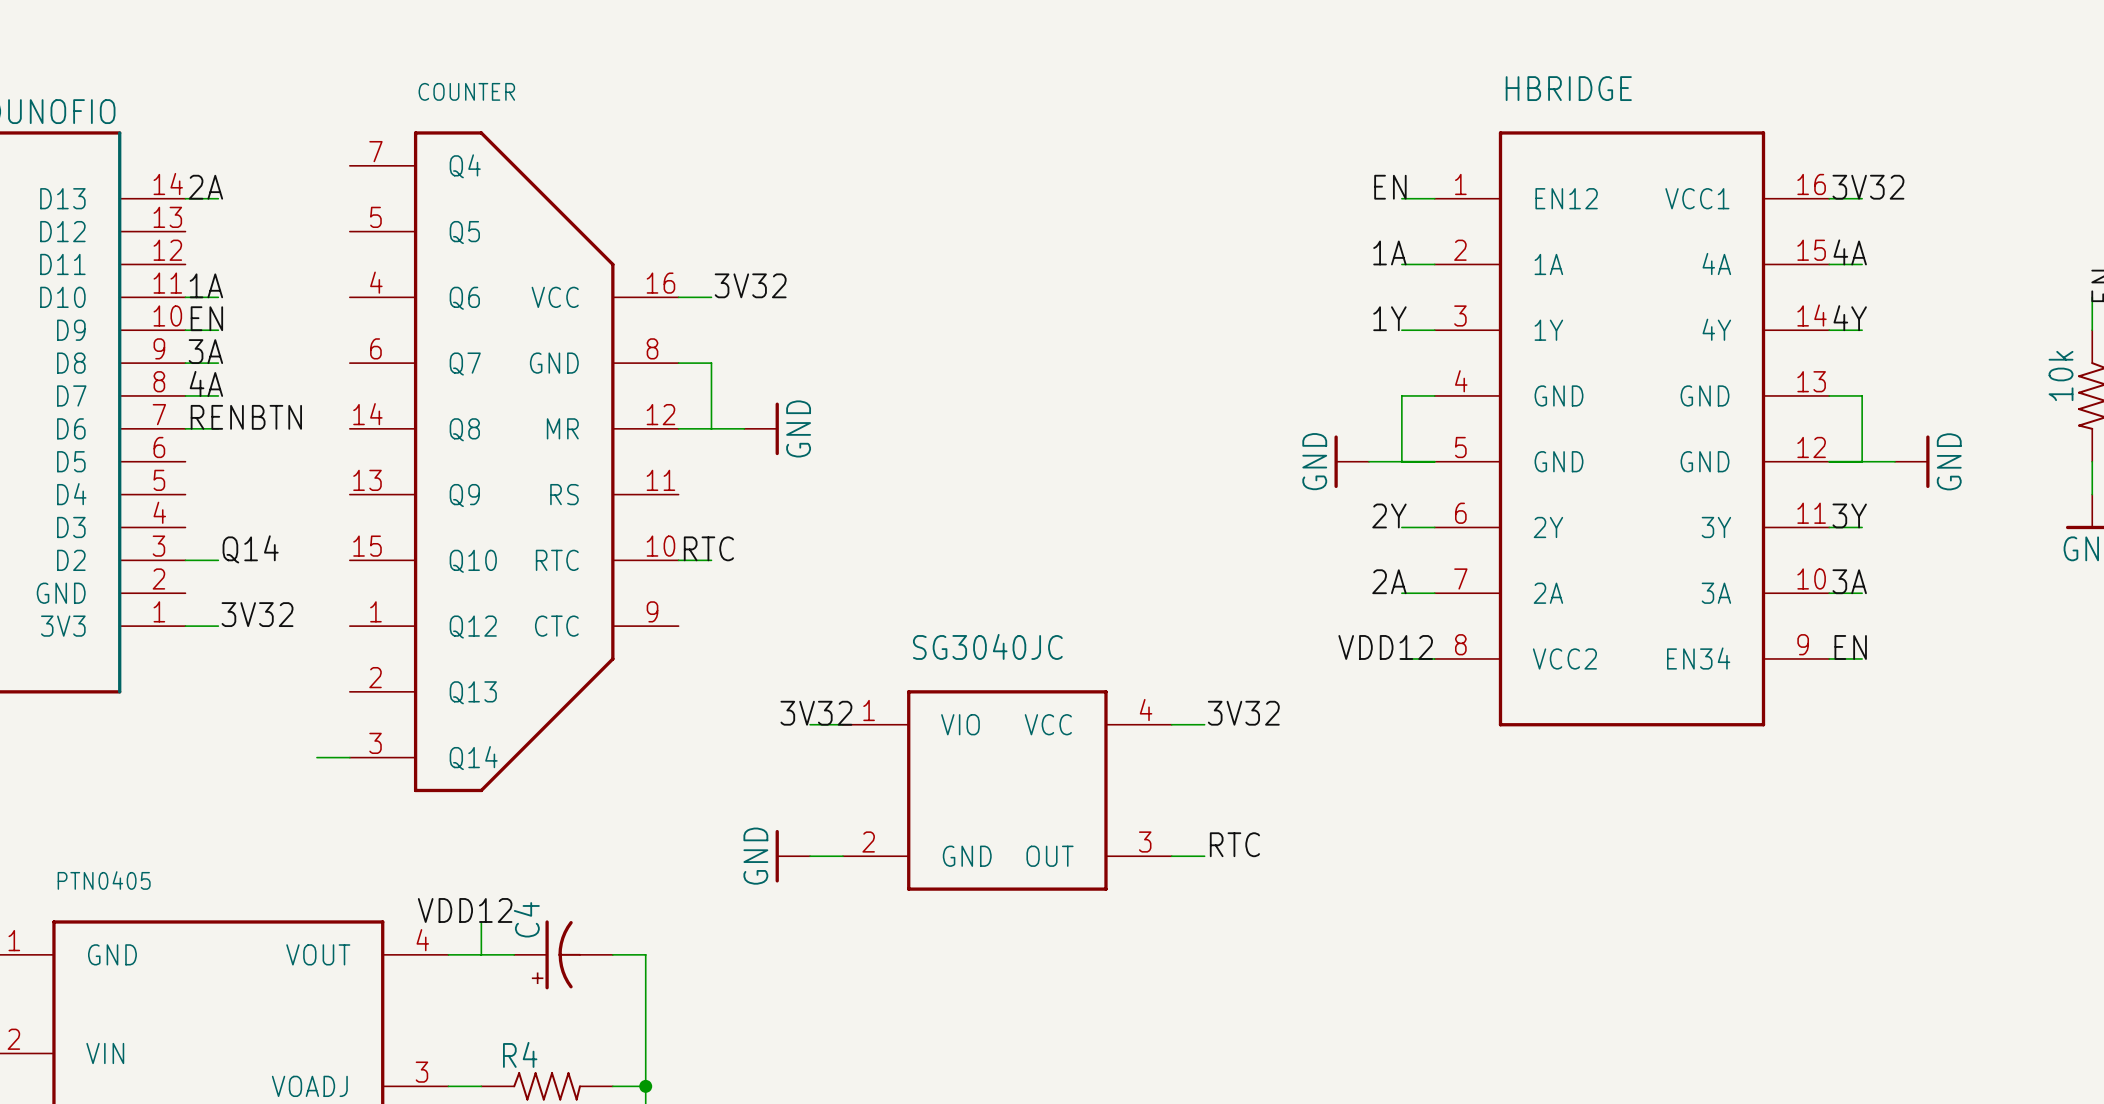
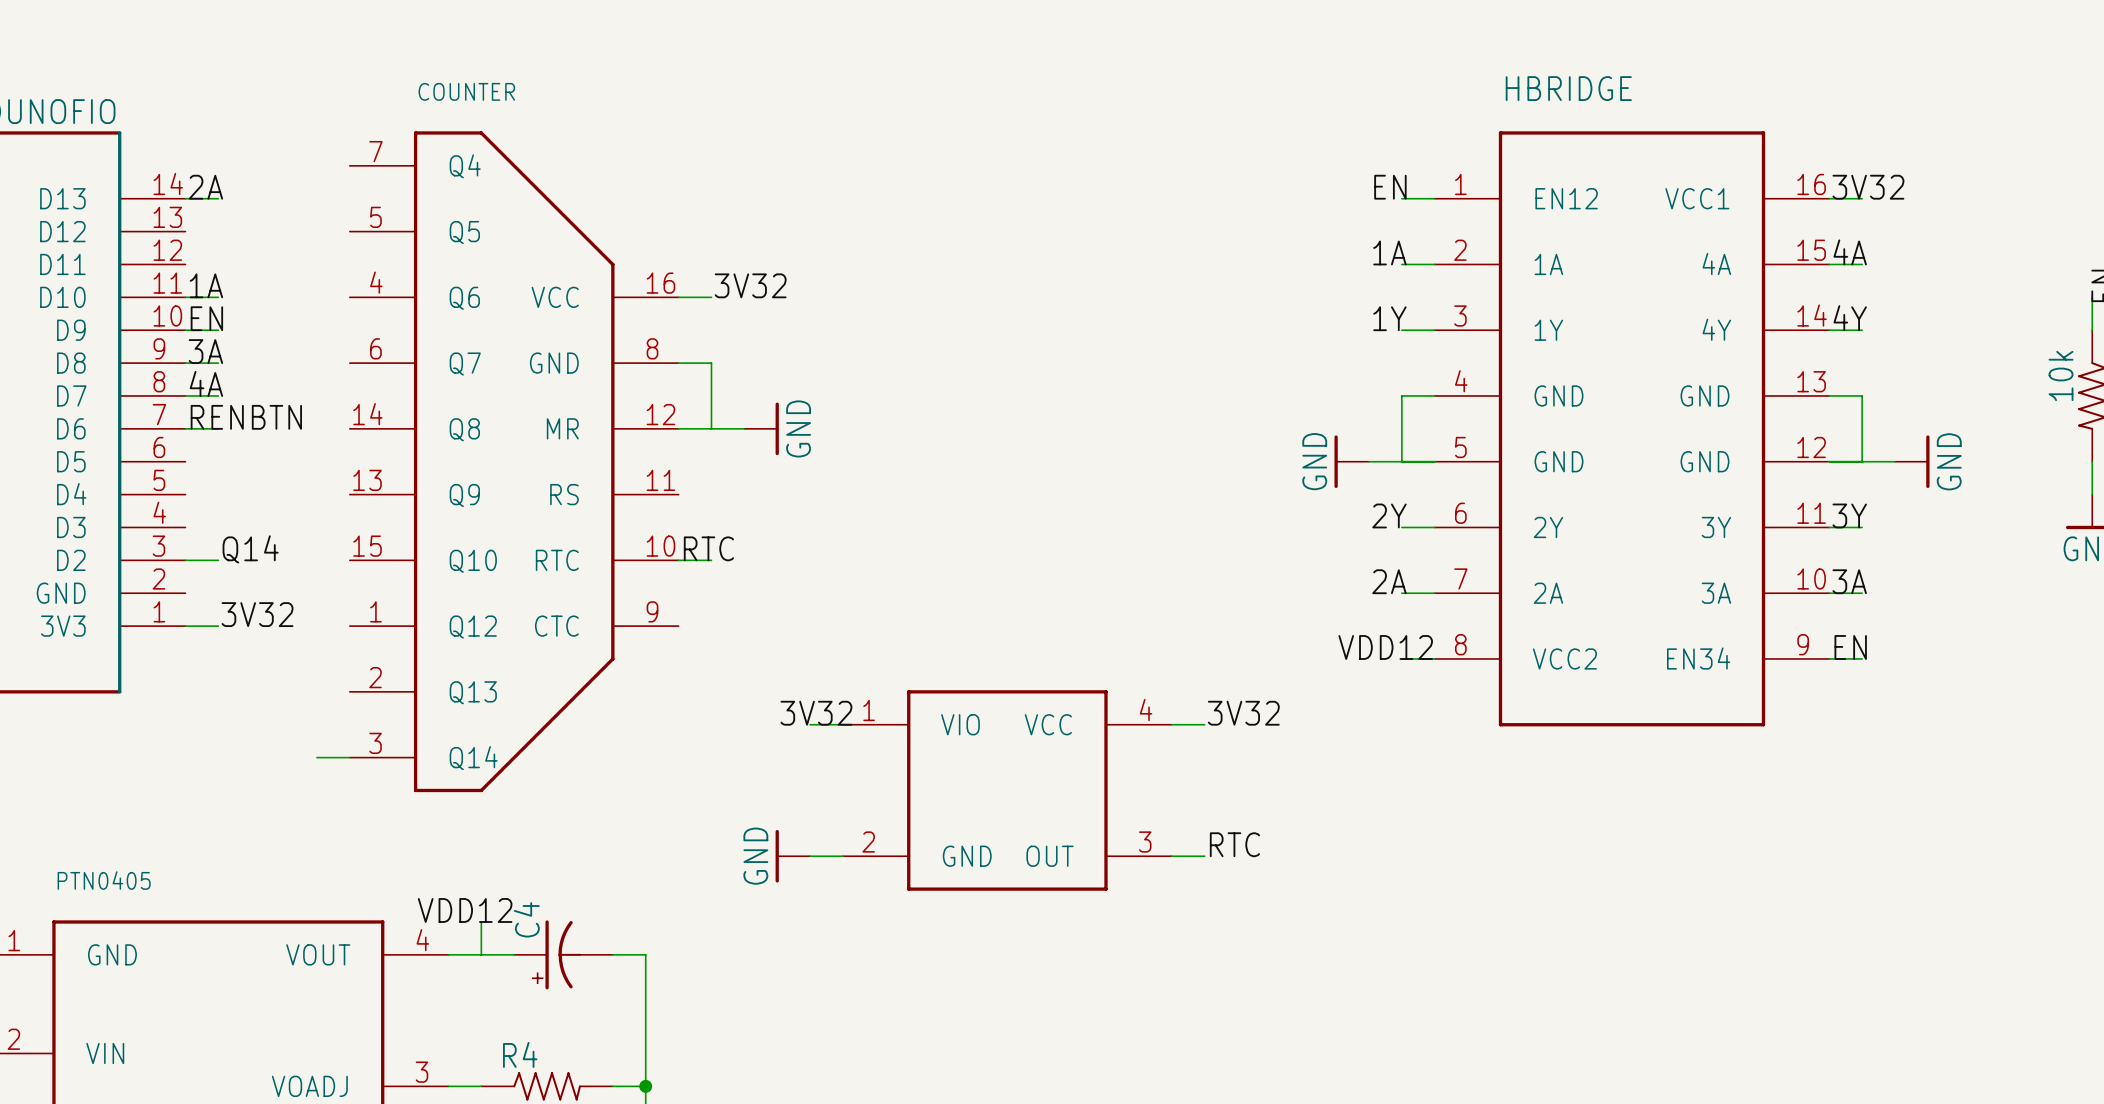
SG3040JC name: SG3040JC (987, 646) -> none

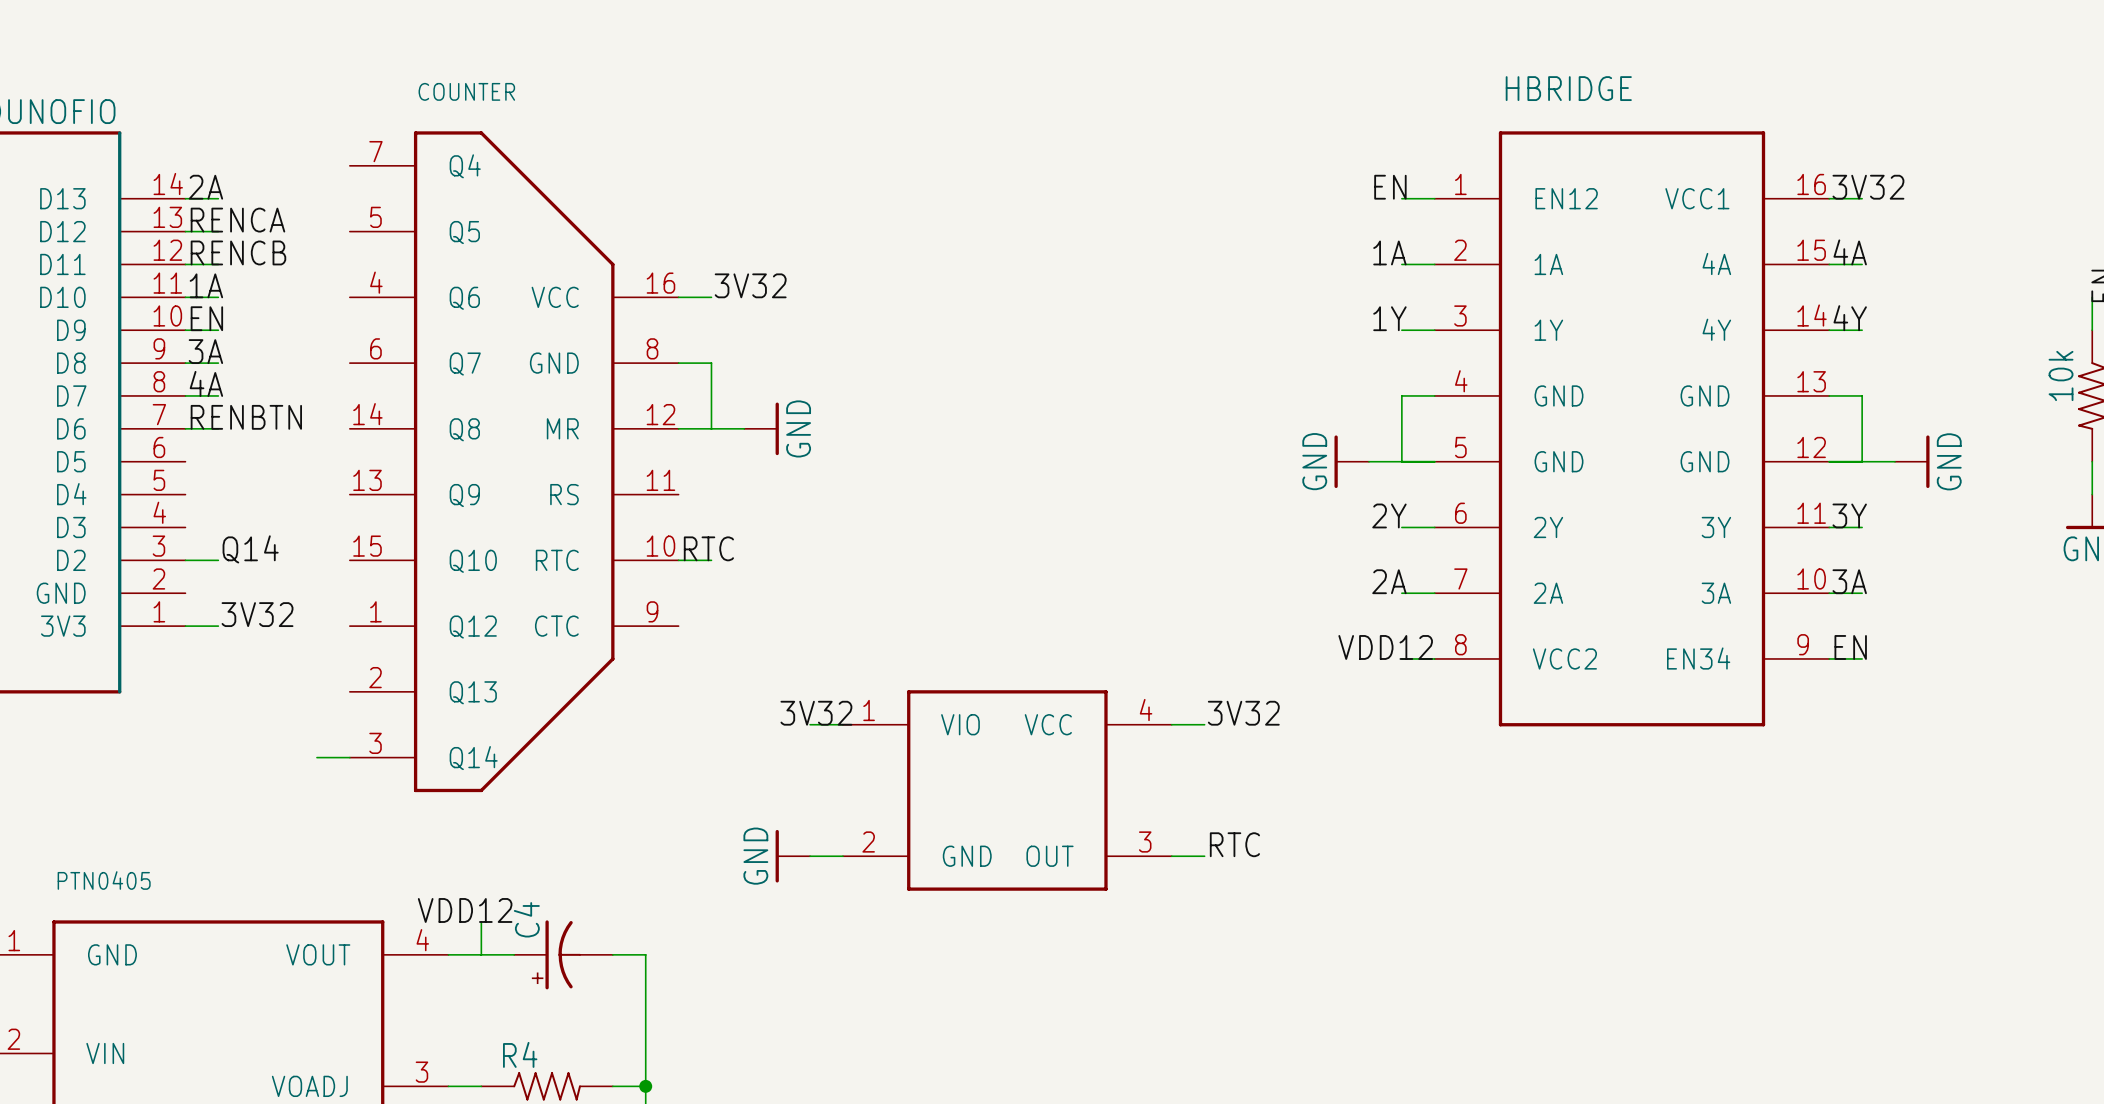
label: none -> RENCA (237, 220)
wire: none -> (185, 231) (218, 231)
label: none -> RENCB (238, 252)
wire: none -> (185, 264) (218, 264)

